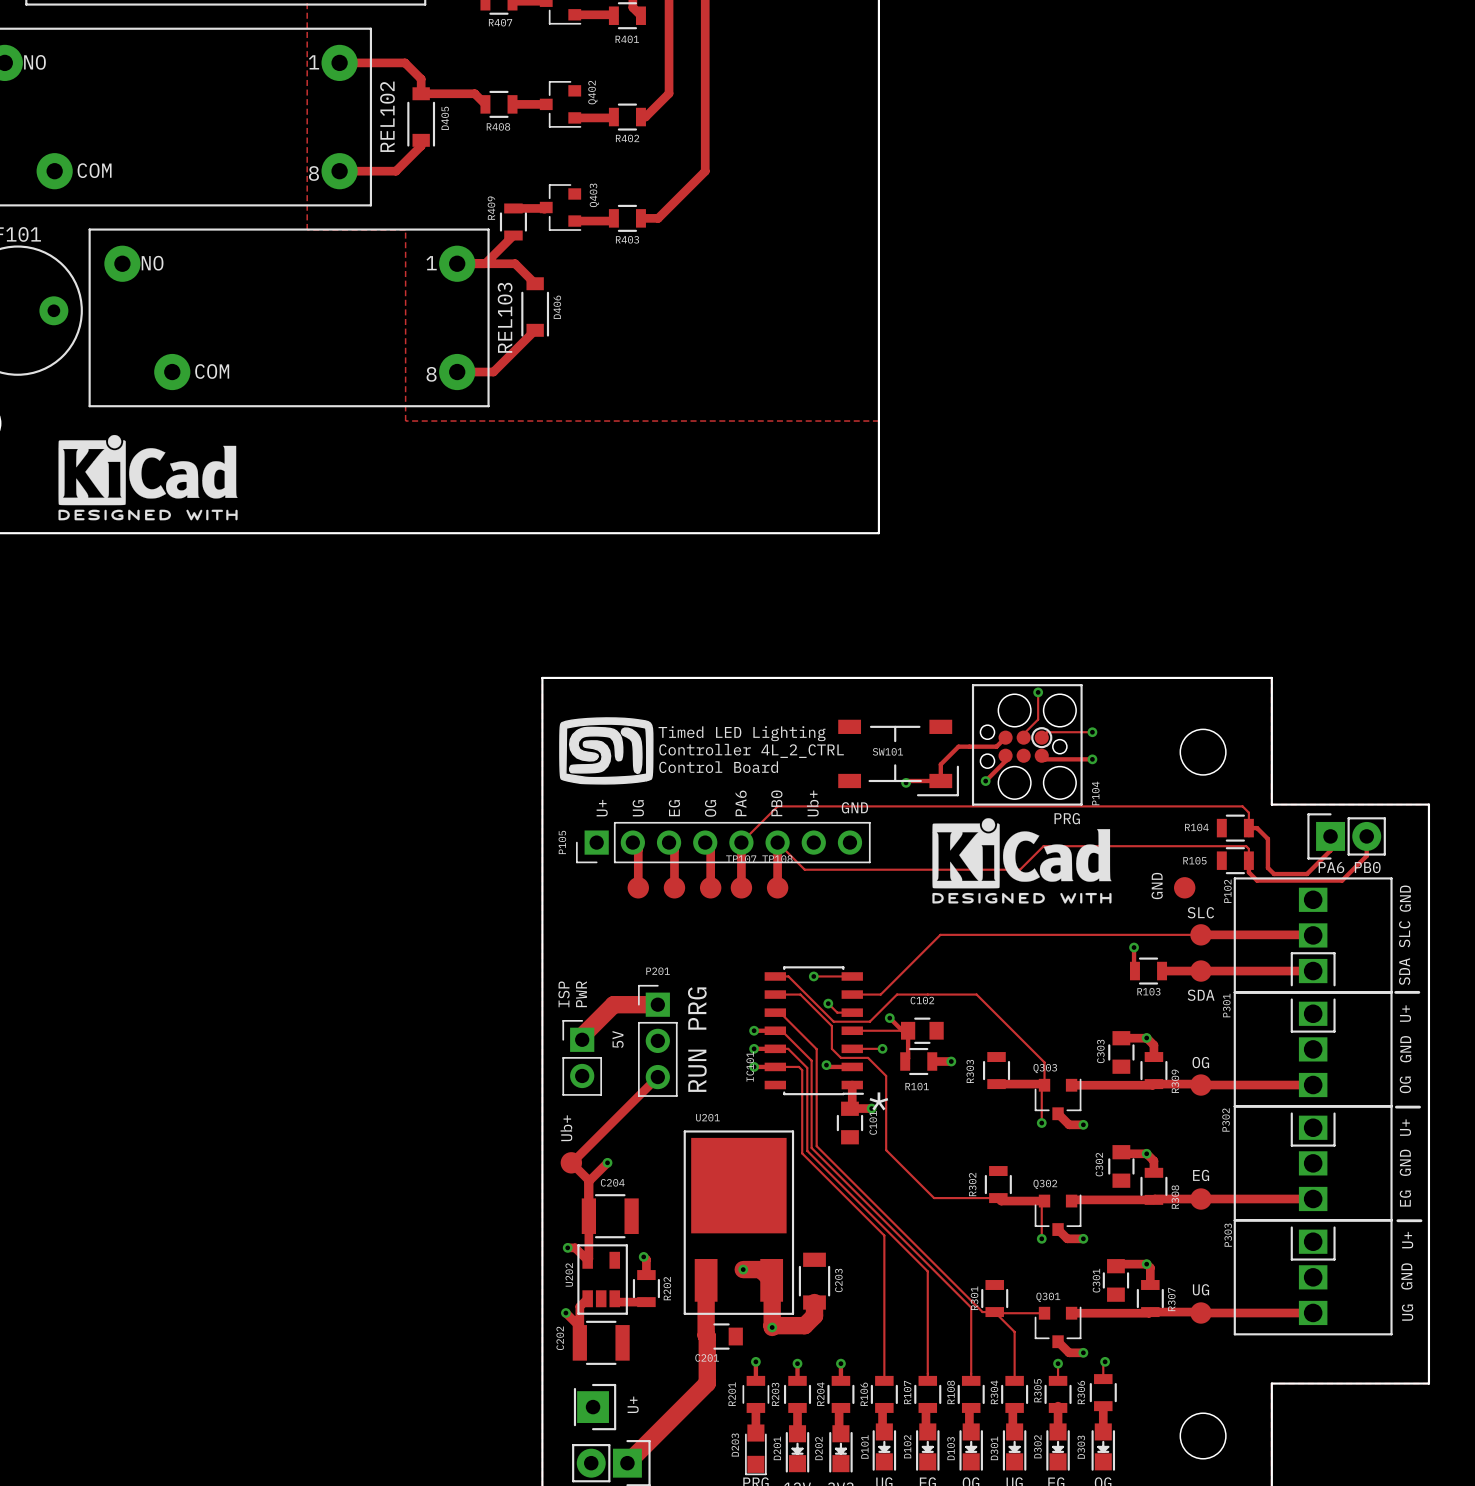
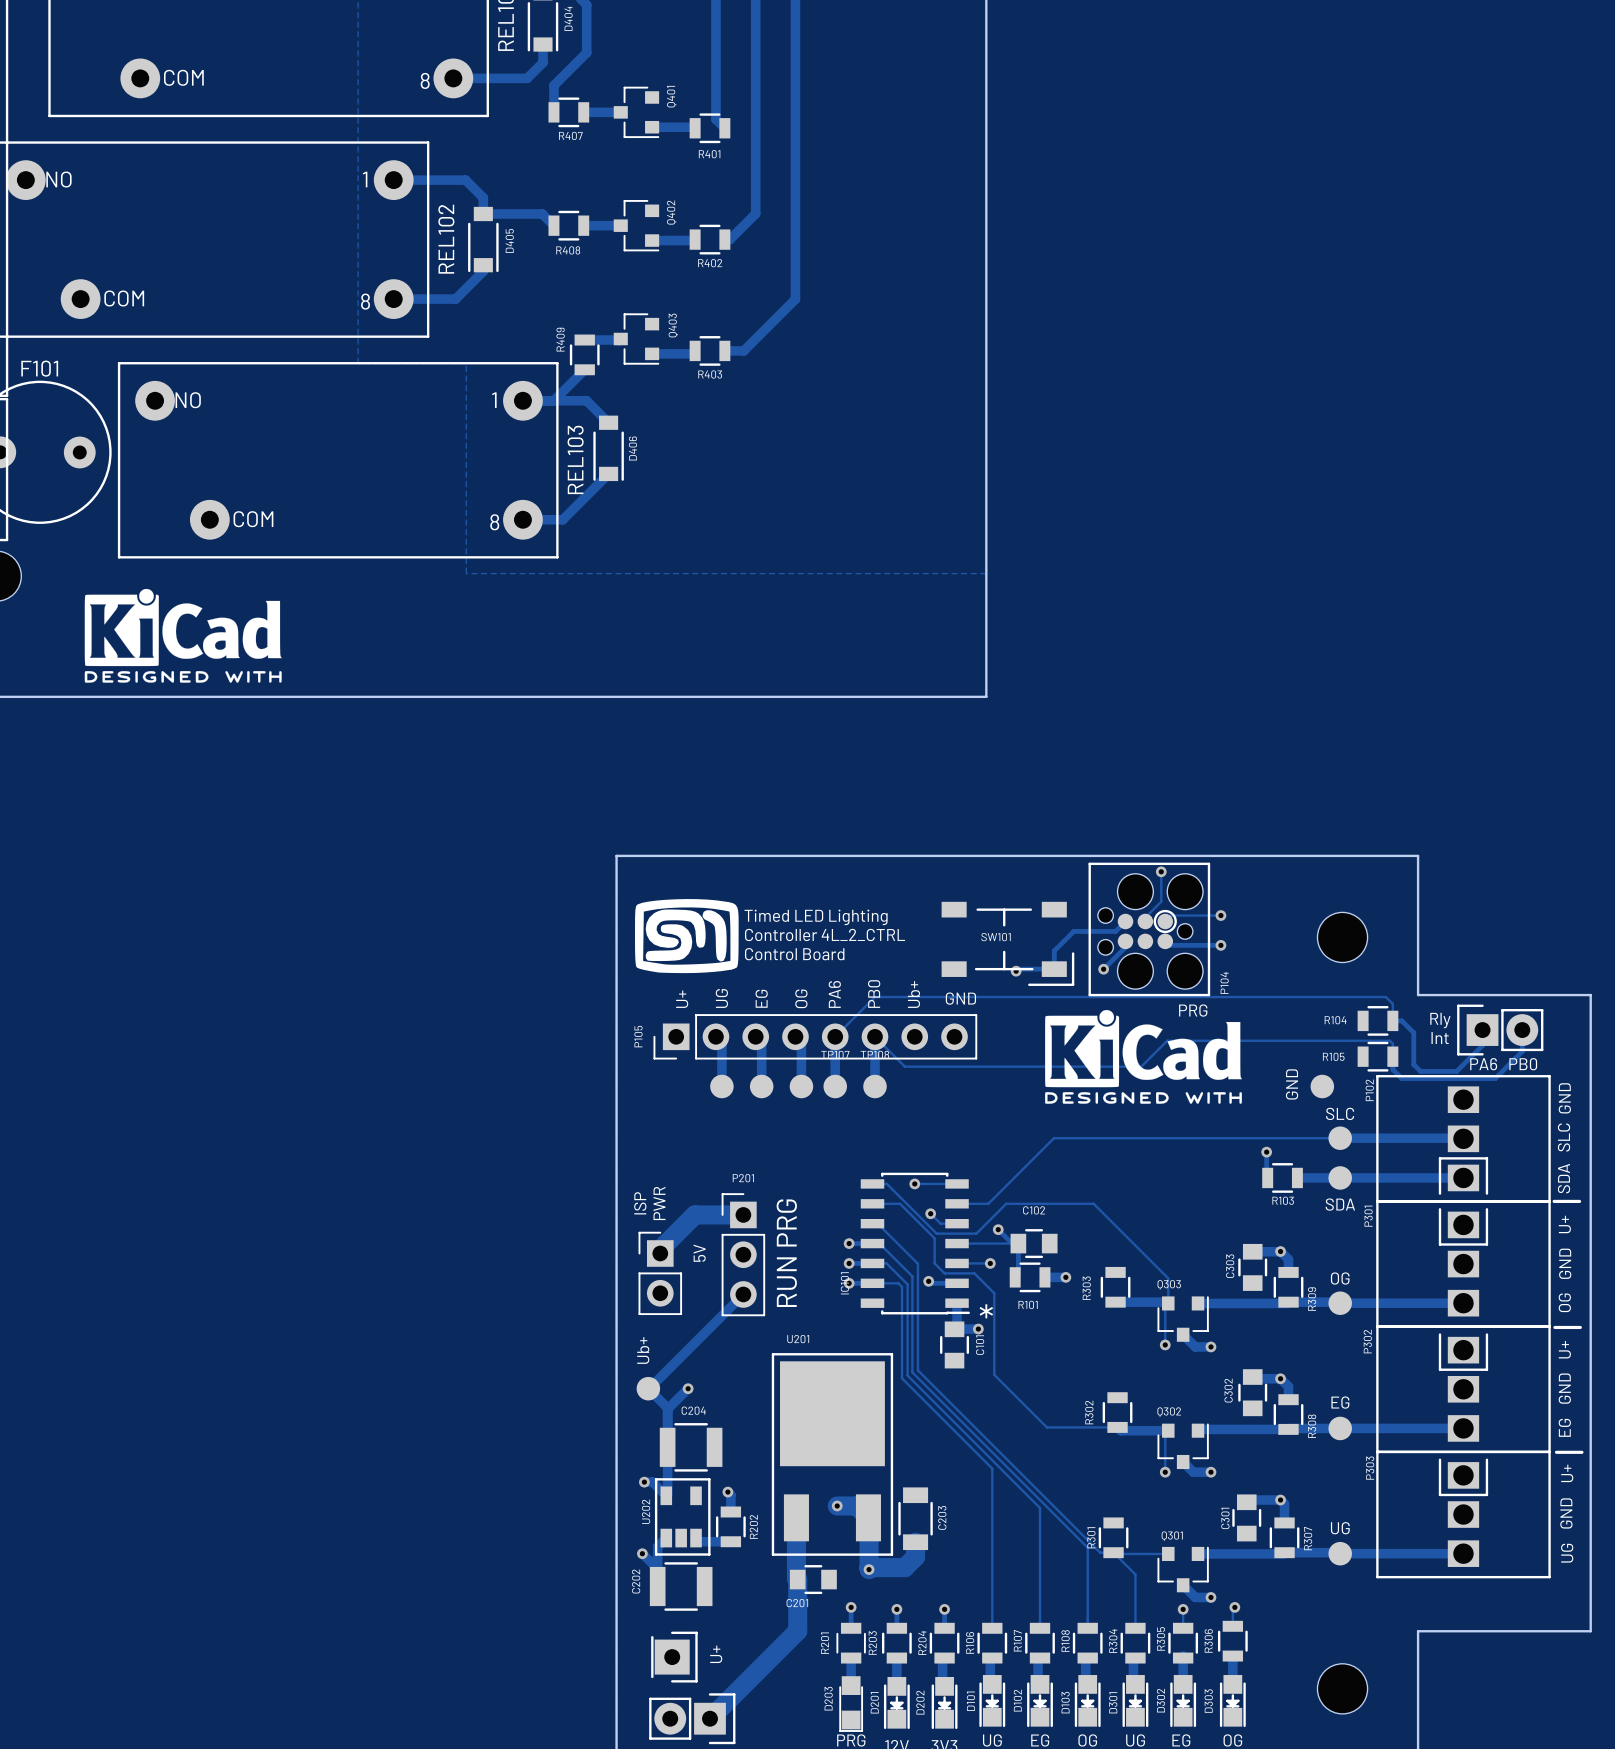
text: none -> Rly (1440, 1020)
text: none -> Int (1440, 1038)

